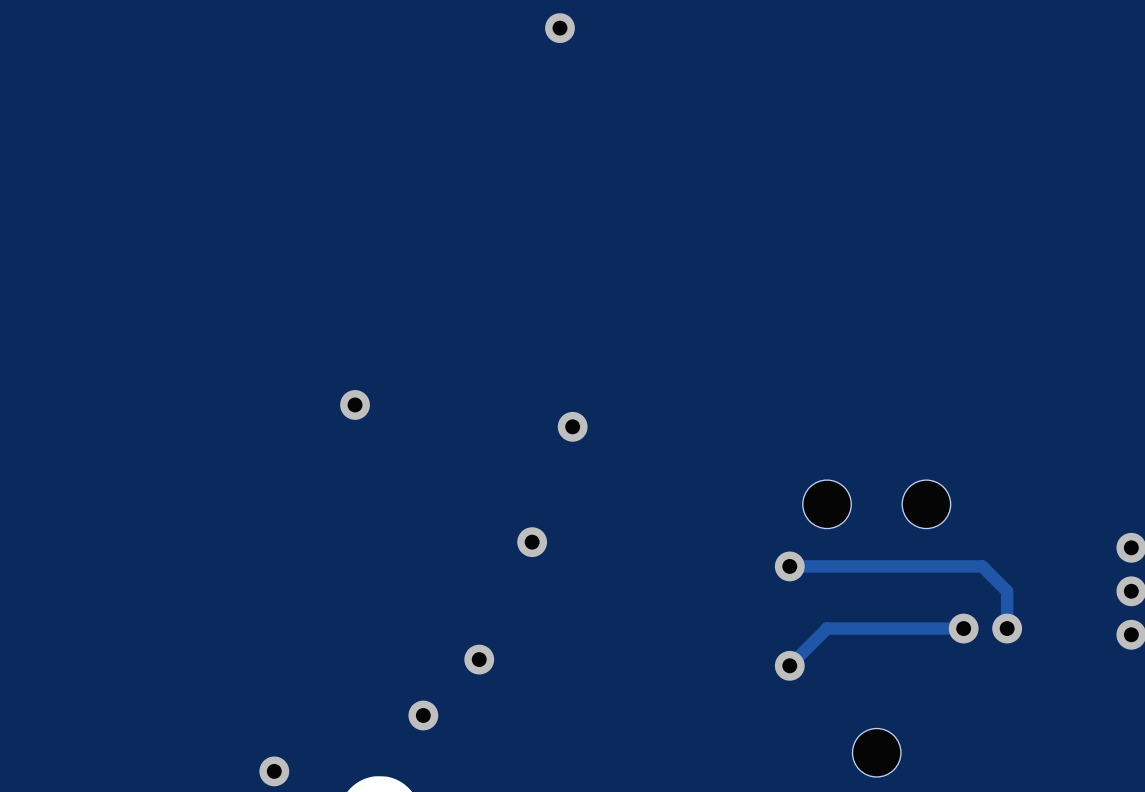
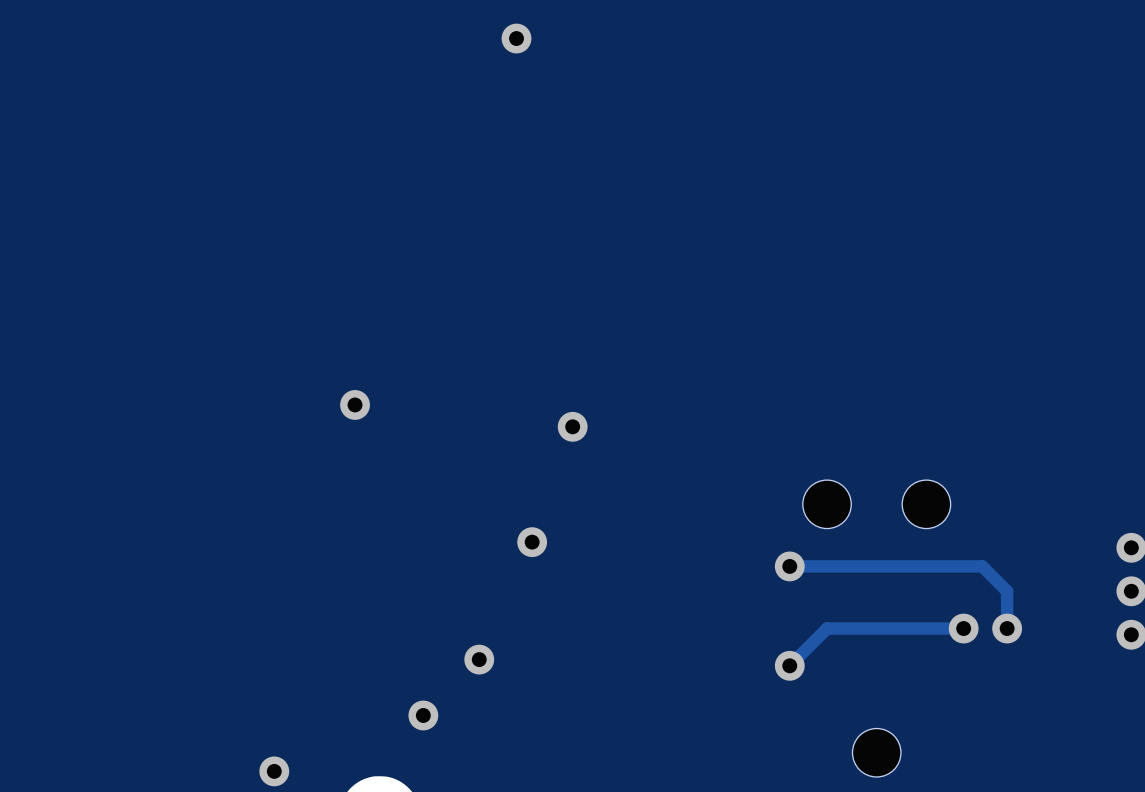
via position: (559, 28) -> (516, 38)

